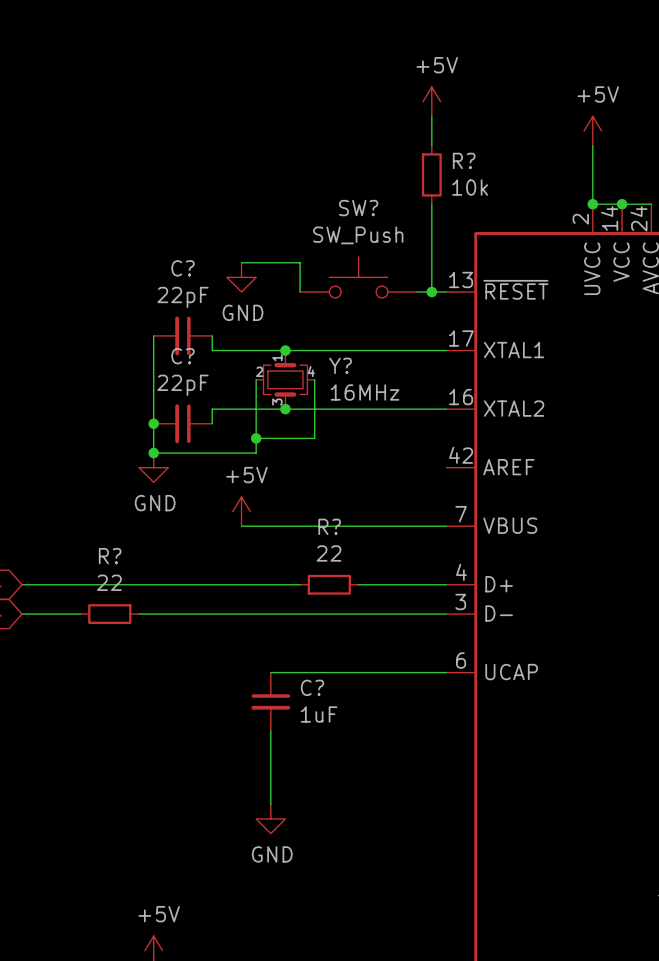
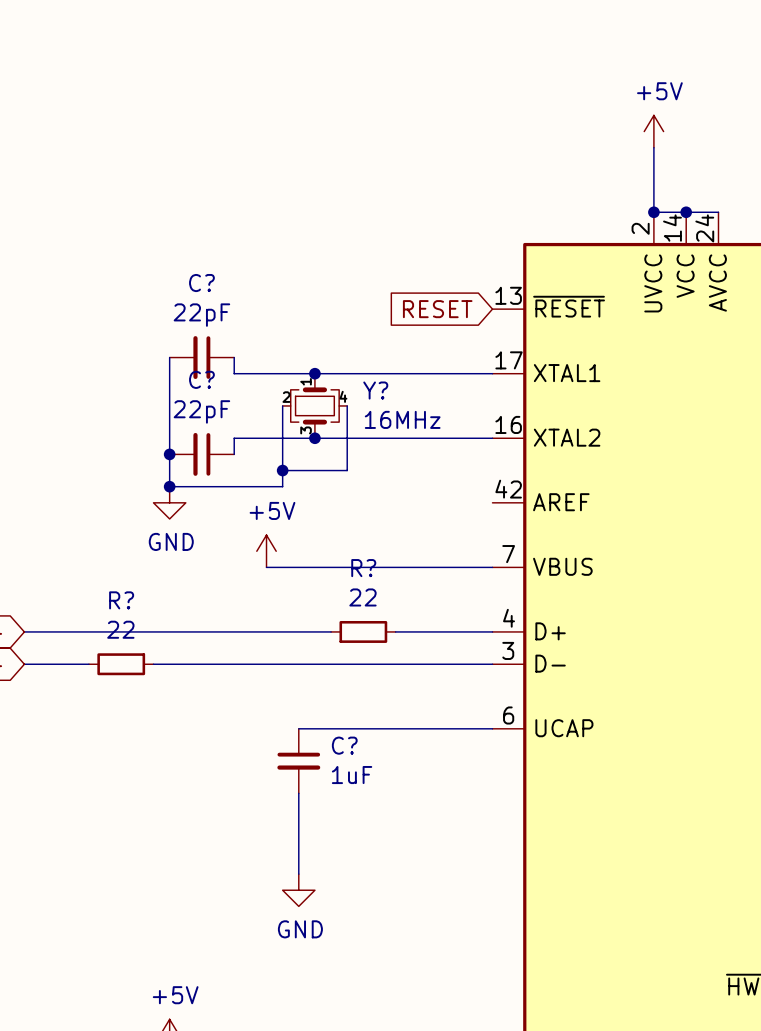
power symbol: +5V (431, 101) -> none
wire: (431, 116) (431, 145) -> none
R?: 10k (431, 174) -> none
wire: (431, 204) (431, 292) -> none
wire: (241, 262) (300, 262) (300, 292) -> none
power symbol: GND (241, 277) -> none
SW?: SW_Push (358, 277) -> none
global label: none -> RESET (437, 309)
wire: (417, 292) (446, 292) -> none
junction: (431, 292) -> none

